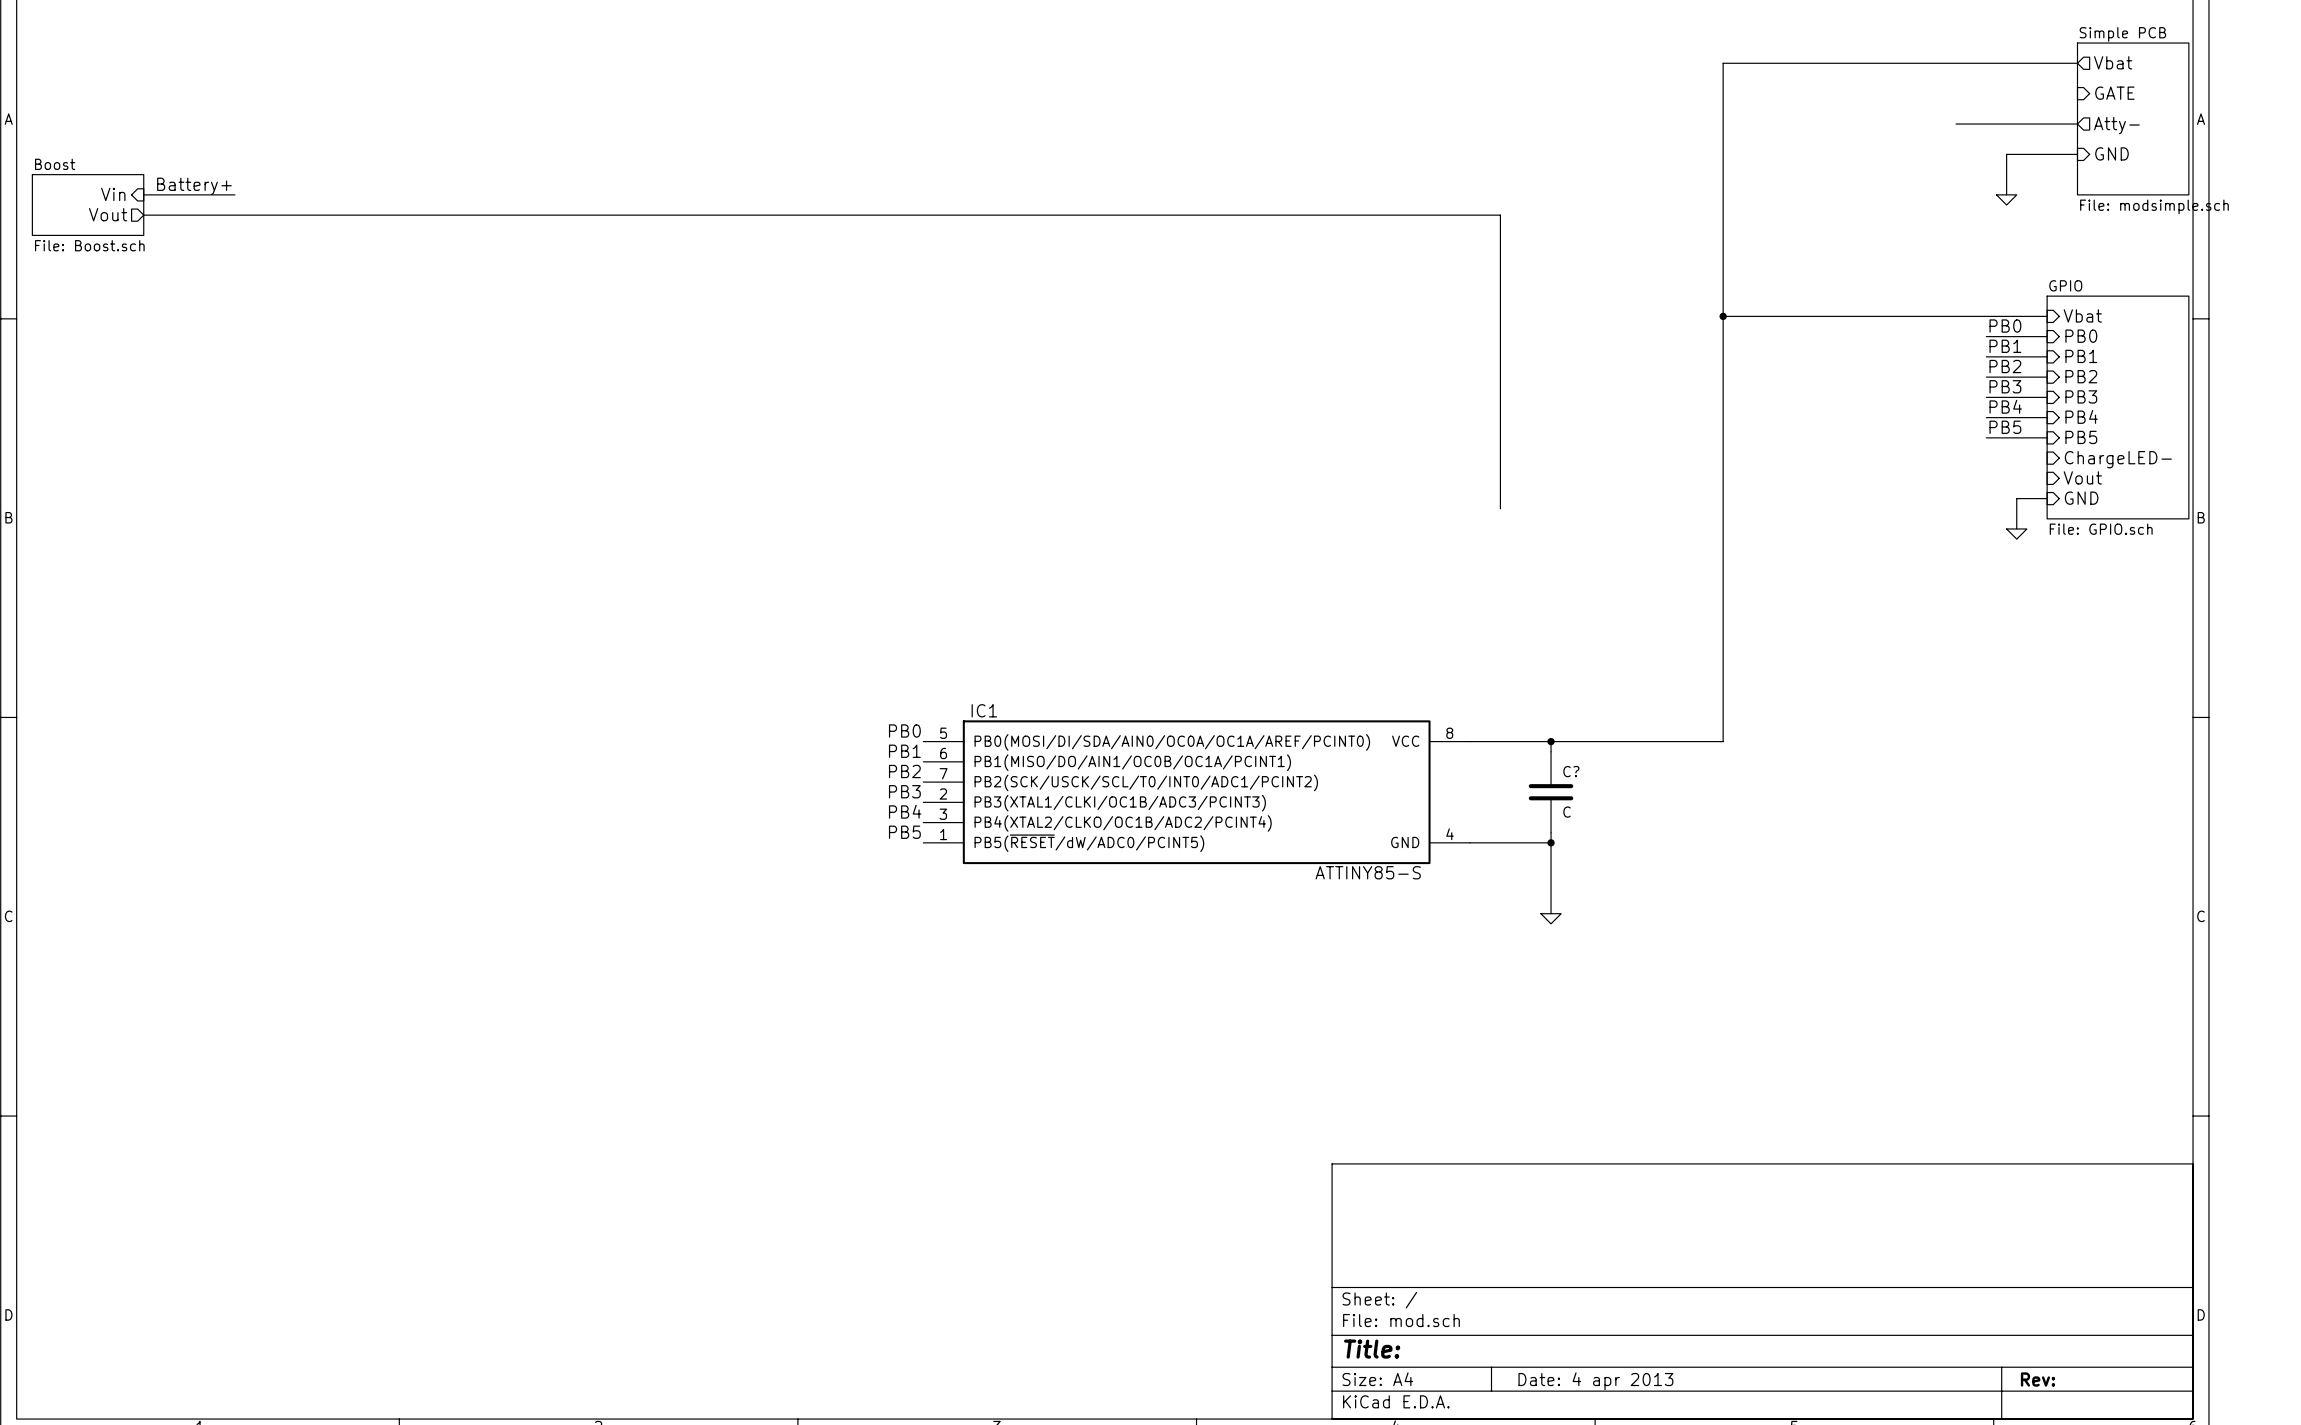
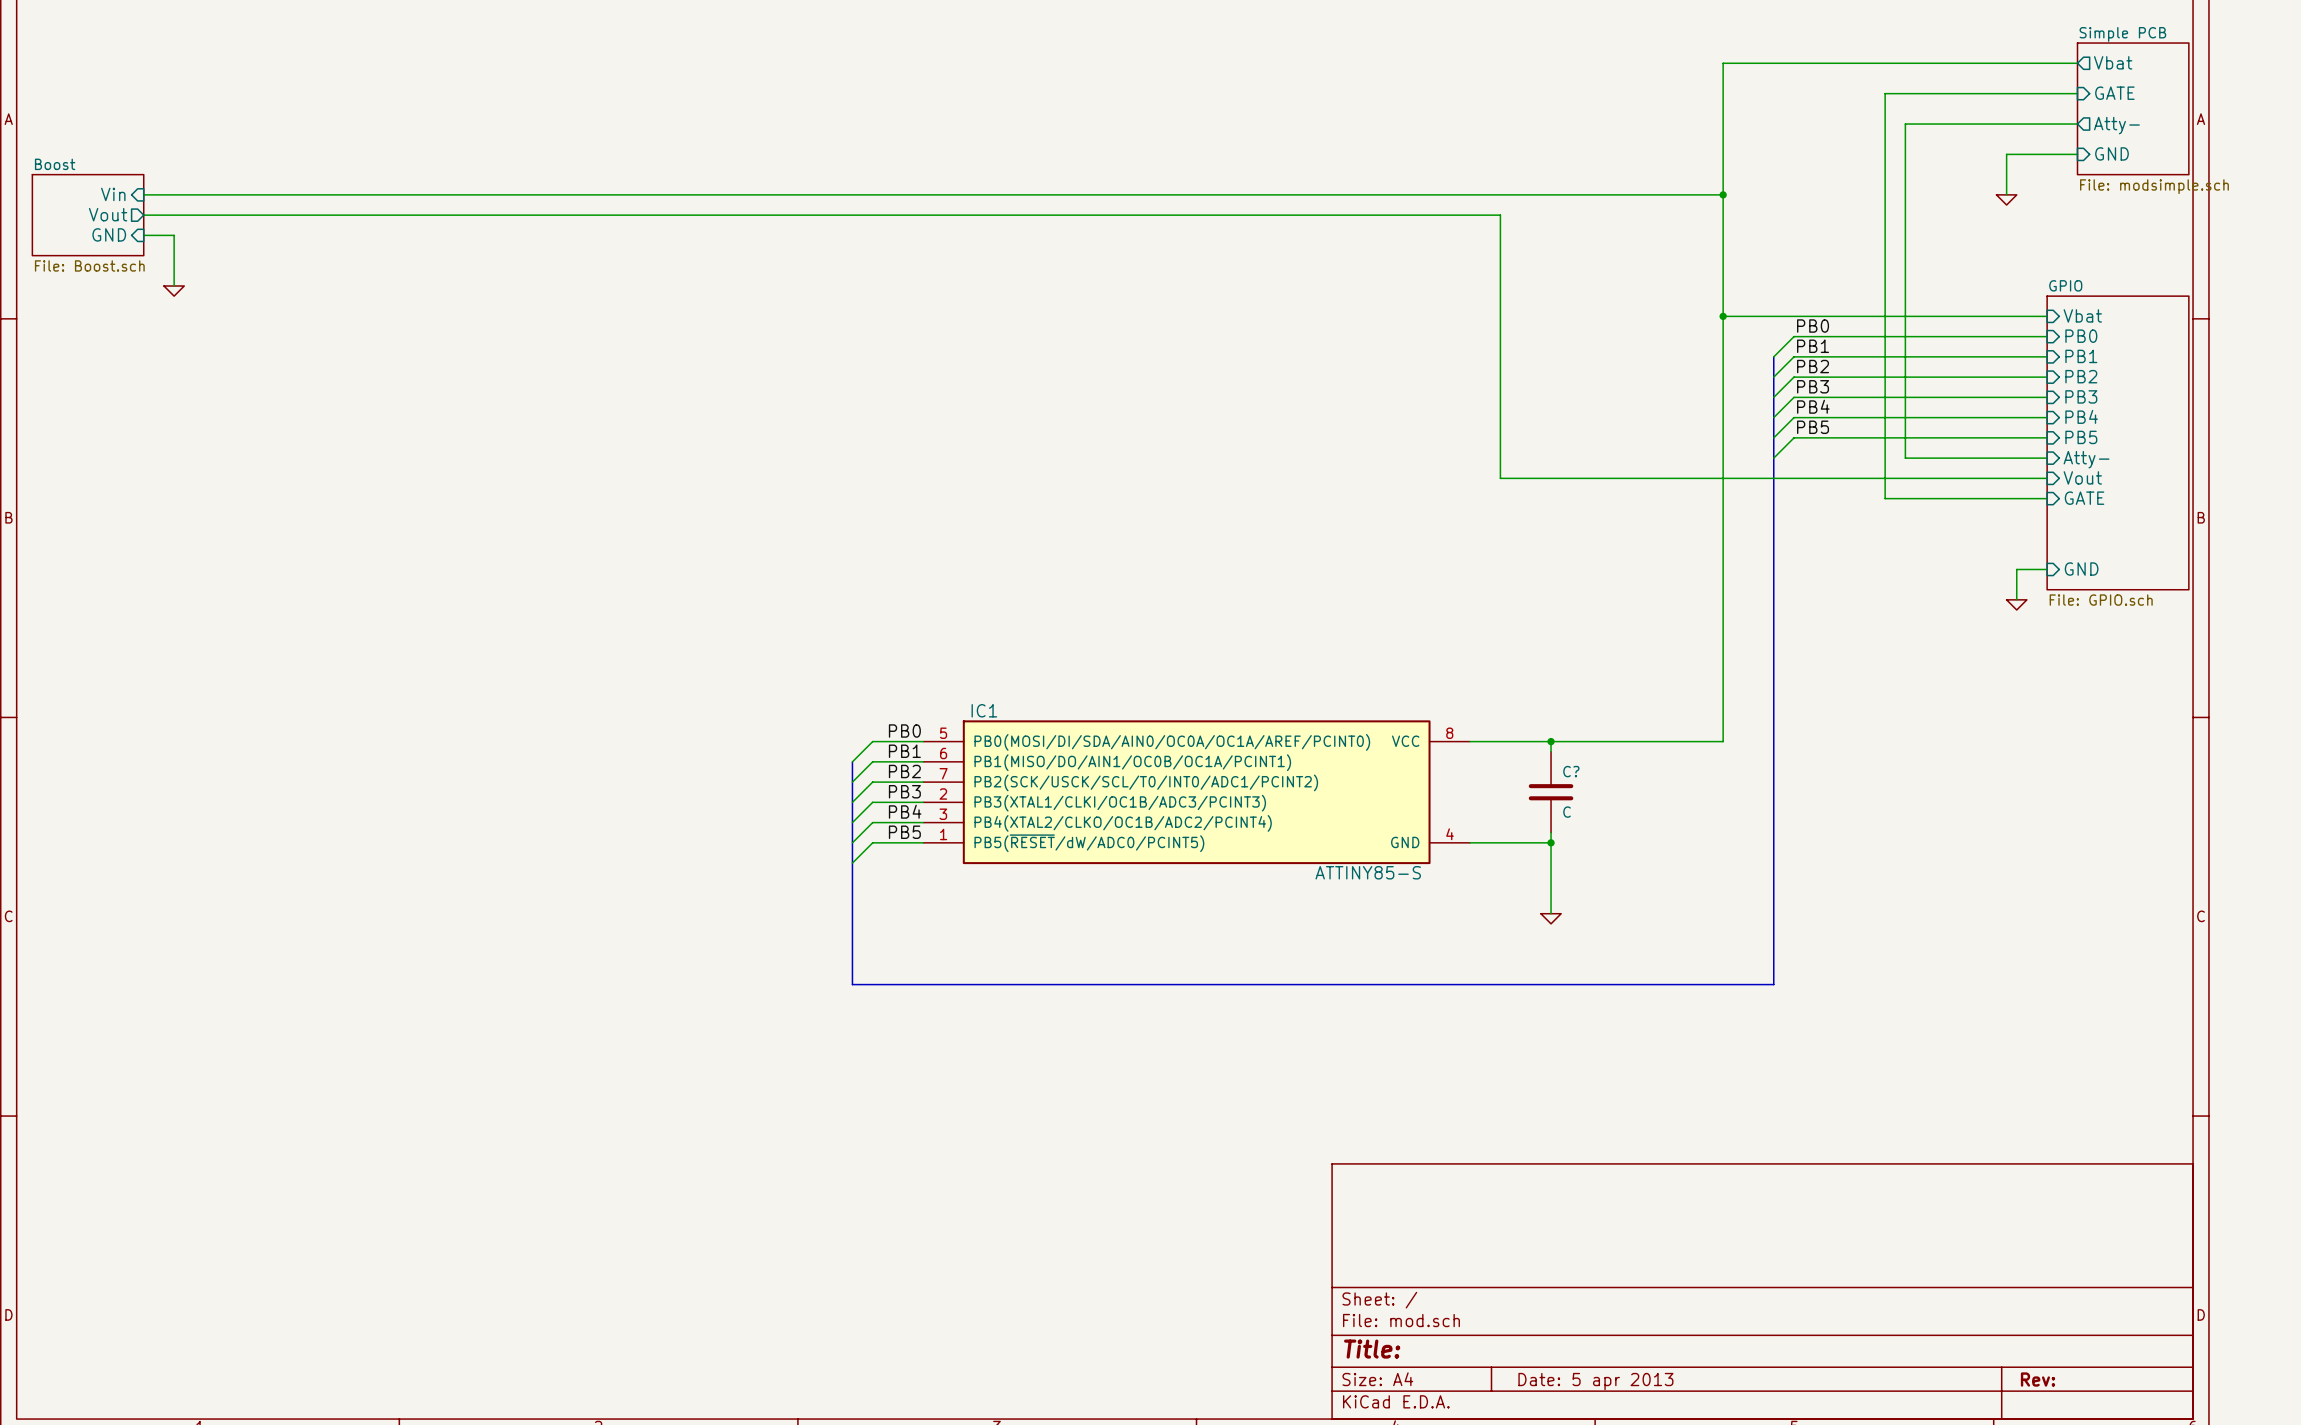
sheet Simple PCB: none -> File: modsimple.sch (2133, 108)
sheet Simple PCB: File: modsimple.sch (2133, 118) -> none
wire: none -> (1956, 124) (1905, 124) (1905, 458) (2047, 458)
label: Battery+ (194, 186) -> none
wire: none -> (234, 194) (1723, 194)
junction: none -> (1723, 194)
sheet Boost: File: Boost.sch (88, 205) -> none
sheet Boost: none -> File: Boost.sch (88, 215)
sheet pin: none -> GND (109, 234)
wire: none -> (143, 235) (174, 235) (174, 286)
power symbol: none -> (174, 291)
label position: PB0 (2005, 326) -> PB0 (1813, 326)
wire: none -> (1986, 336) (1794, 336) (1773, 356)
label position: PB1 (2005, 346) -> PB1 (1813, 346)
bus: none -> (1773, 356) (1773, 984) (852, 984) (852, 761)
wire: none -> (1986, 356) (1794, 356) (1773, 377)
label position: PB2 (2005, 366) -> PB2 (1813, 366)
wire: none -> (1986, 377) (1794, 377) (1773, 397)
label position: PB3 (2005, 386) -> PB3 (1813, 386)
wire: none -> (1986, 397) (1794, 397) (1773, 417)
label position: PB4 (2005, 406) -> PB4 (1813, 406)
sheet GPIO: File: GPIO.sch (2117, 407) -> none
wire: none -> (1986, 417) (1794, 417) (1773, 437)
label position: PB5 (2005, 427) -> PB5 (1813, 427)
wire: none -> (1986, 437) (1794, 437) (1773, 458)
sheet GPIO: none -> File: GPIO.sch (2117, 442)
sheet pin: ChargeLED- (2118, 459) -> Atty- (2086, 459)
wire: (1500, 478) (1500, 508) -> (1500, 478) (2047, 478)
wire: (2016, 498) (2016, 528) -> (2016, 498) (1885, 498) (1885, 93) (2077, 93)
sheet pin: GND (2081, 498) -> GATE (2084, 498)
power symbol position: (2016, 534) -> (2016, 604)
wire: none -> (2047, 569) (2016, 569) (2016, 599)
sheet pin: none -> GND (2081, 569)
wire: none -> (923, 741) (872, 741) (852, 761)
wire: none -> (923, 761) (872, 761) (852, 782)
wire: none -> (923, 782) (872, 782) (852, 802)
wire: none -> (923, 802) (872, 802) (852, 822)
wire: none -> (923, 822) (872, 822) (852, 842)
wire: none -> (923, 842) (872, 842) (852, 863)
title block: Date: 4 apr 2013 (1595, 1381) -> Date: 5 apr 2013 (1595, 1381)

